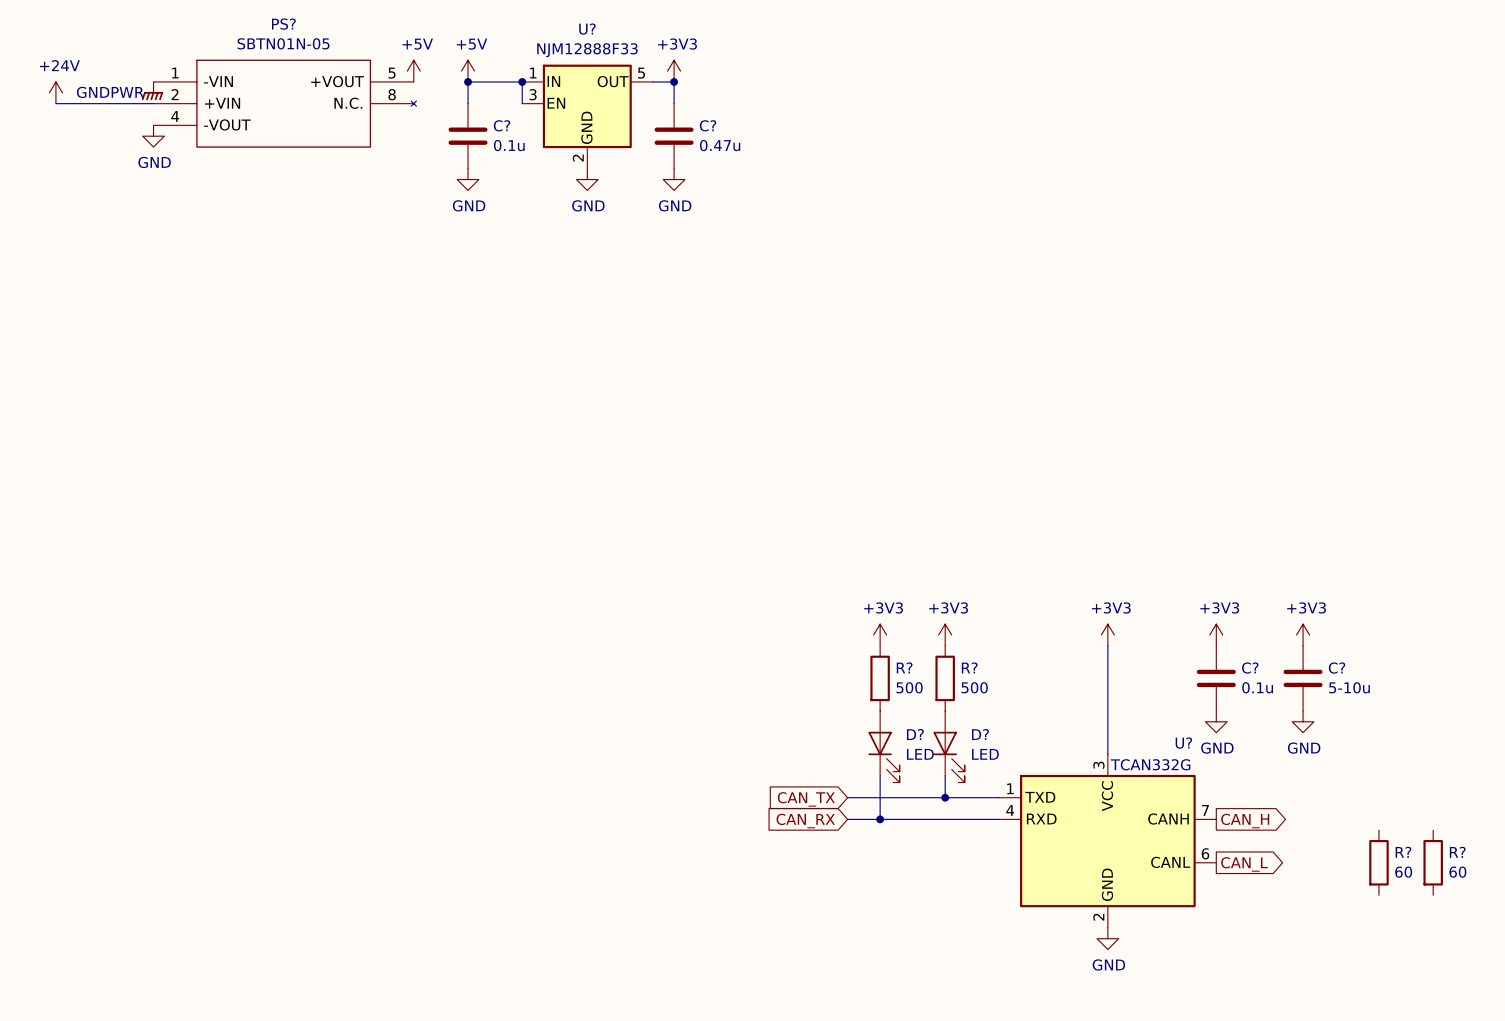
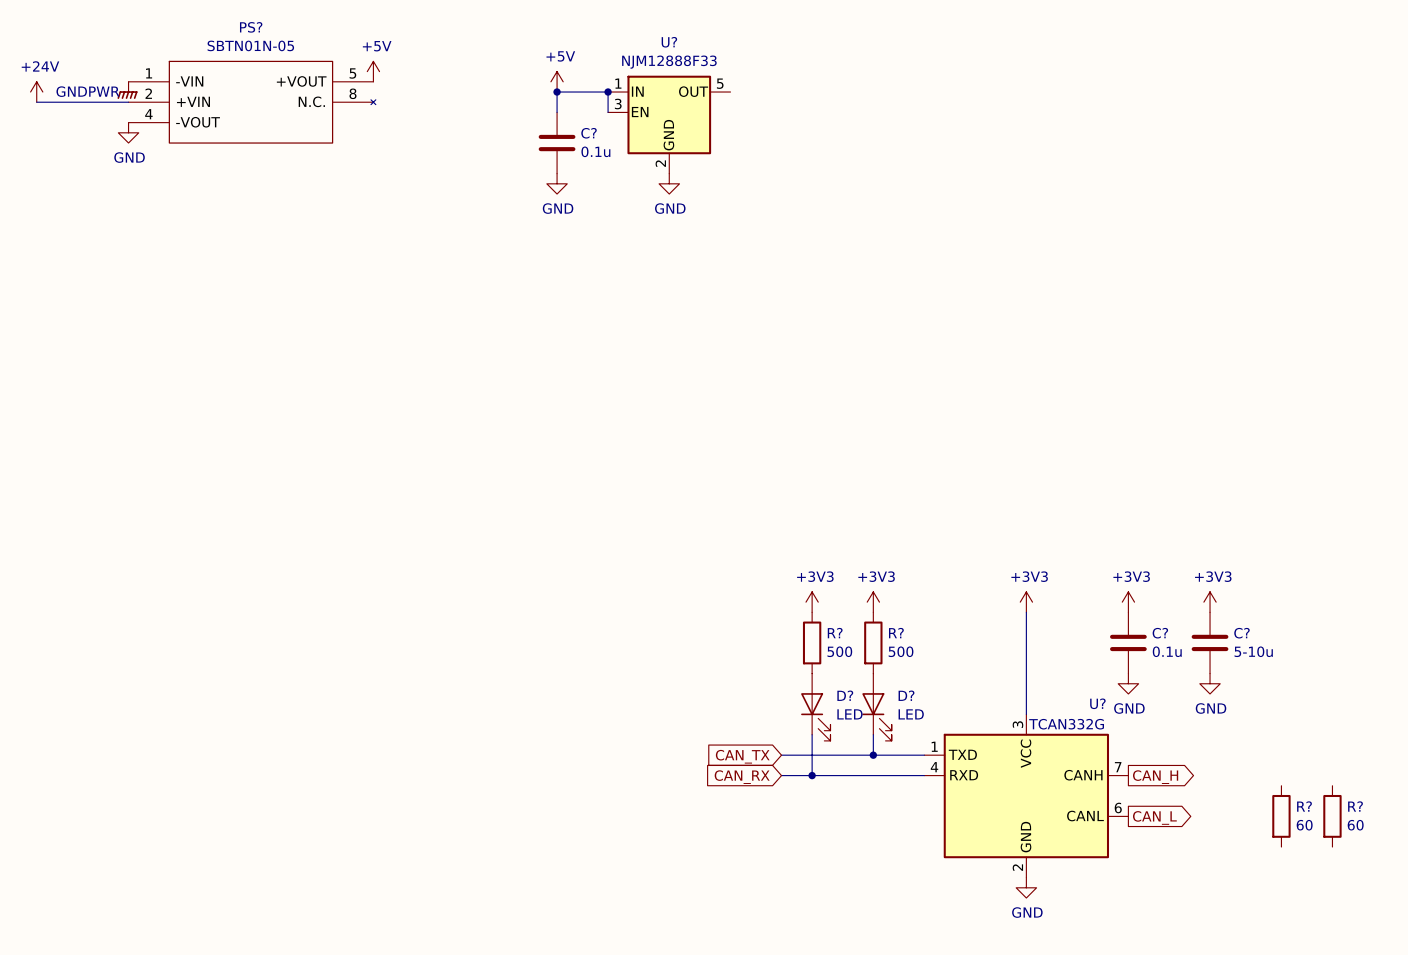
power symbol position: +5V (468, 71) -> +5V (557, 81)
power symbol: +3V3 (674, 71) -> none
junction: (468, 81) -> none
junction: (522, 81) -> none
wire: (652, 81) (674, 81) (674, 103) -> none
junction position: (674, 81) -> (608, 92)
junction: none -> (557, 92)
wire: (468, 103) (468, 81) (522, 81) (522, 103) -> (557, 112) (557, 92) (608, 92) (608, 112)
U? position: (587, 116) -> (669, 124)
C? position: (468, 136) -> (557, 143)
C?: 0.47u (674, 136) -> none
power symbol: GND (468, 179) -> none
power symbol position: GND (587, 179) -> GND (557, 183)
power symbol: GND (674, 179) -> none
power symbol: none -> GND (669, 183)

